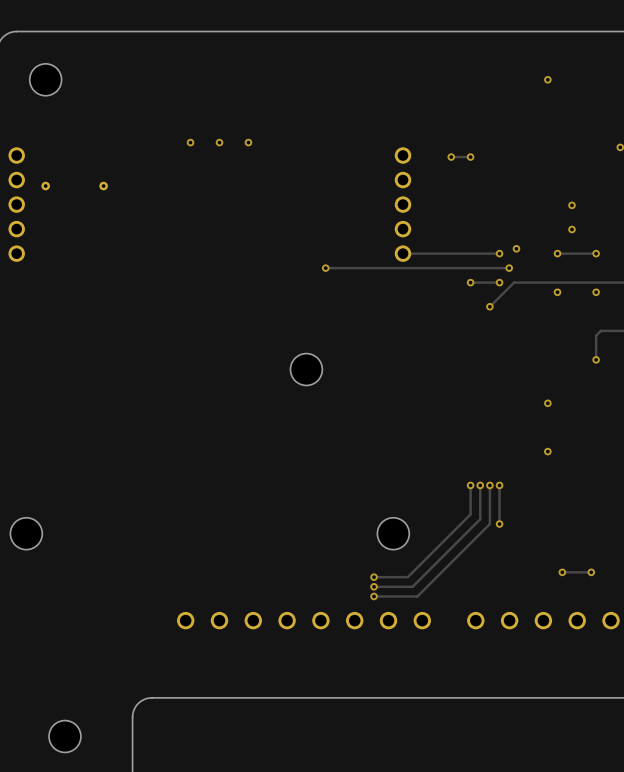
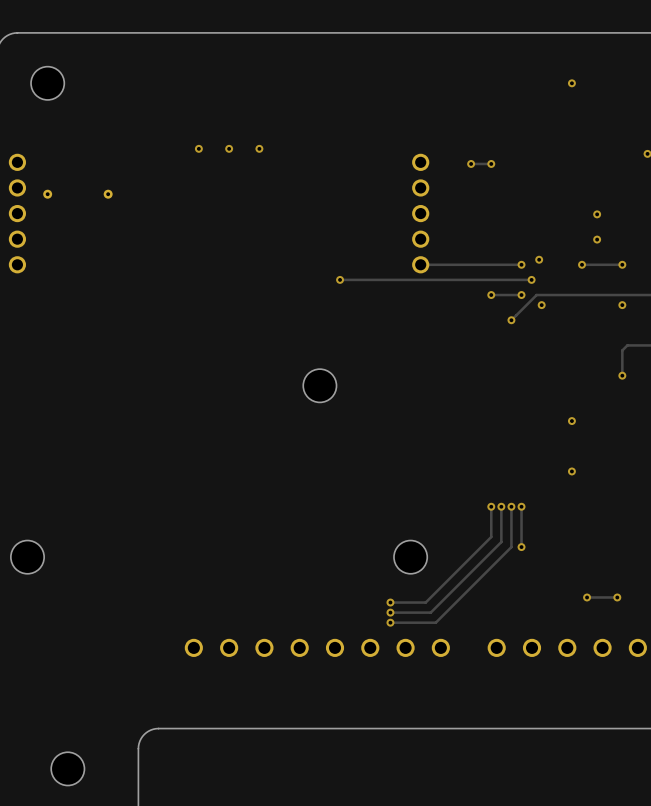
via position: (557, 292) -> (541, 305)

